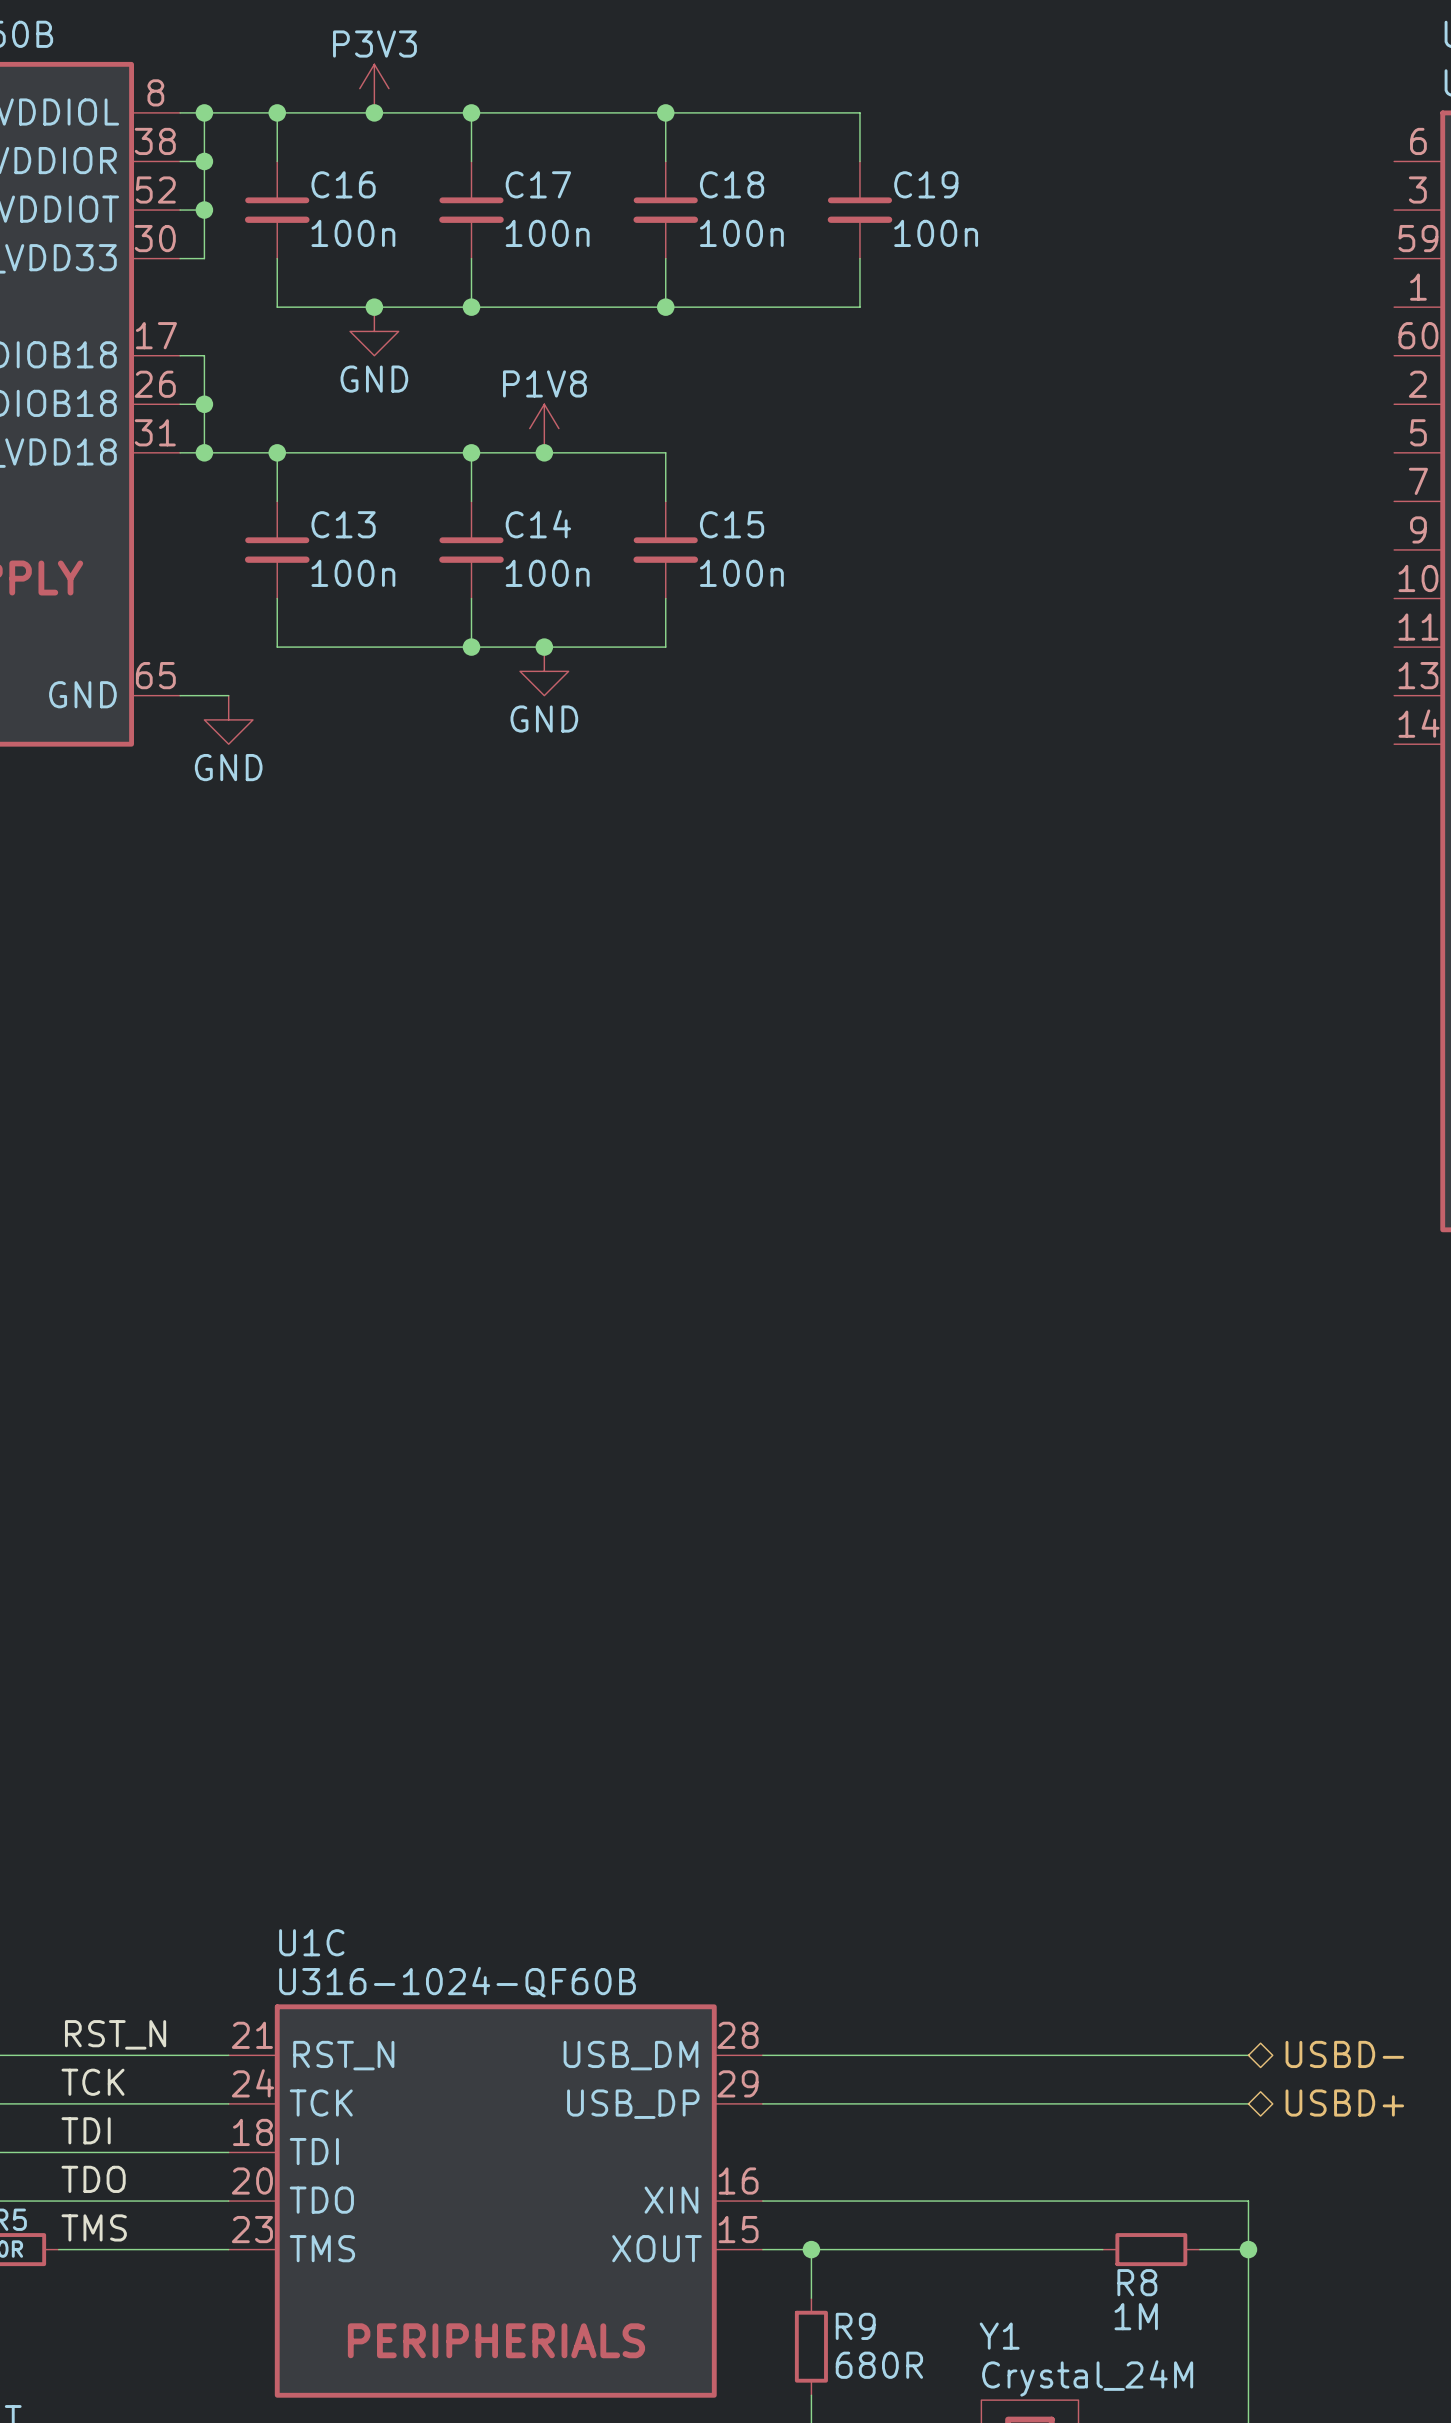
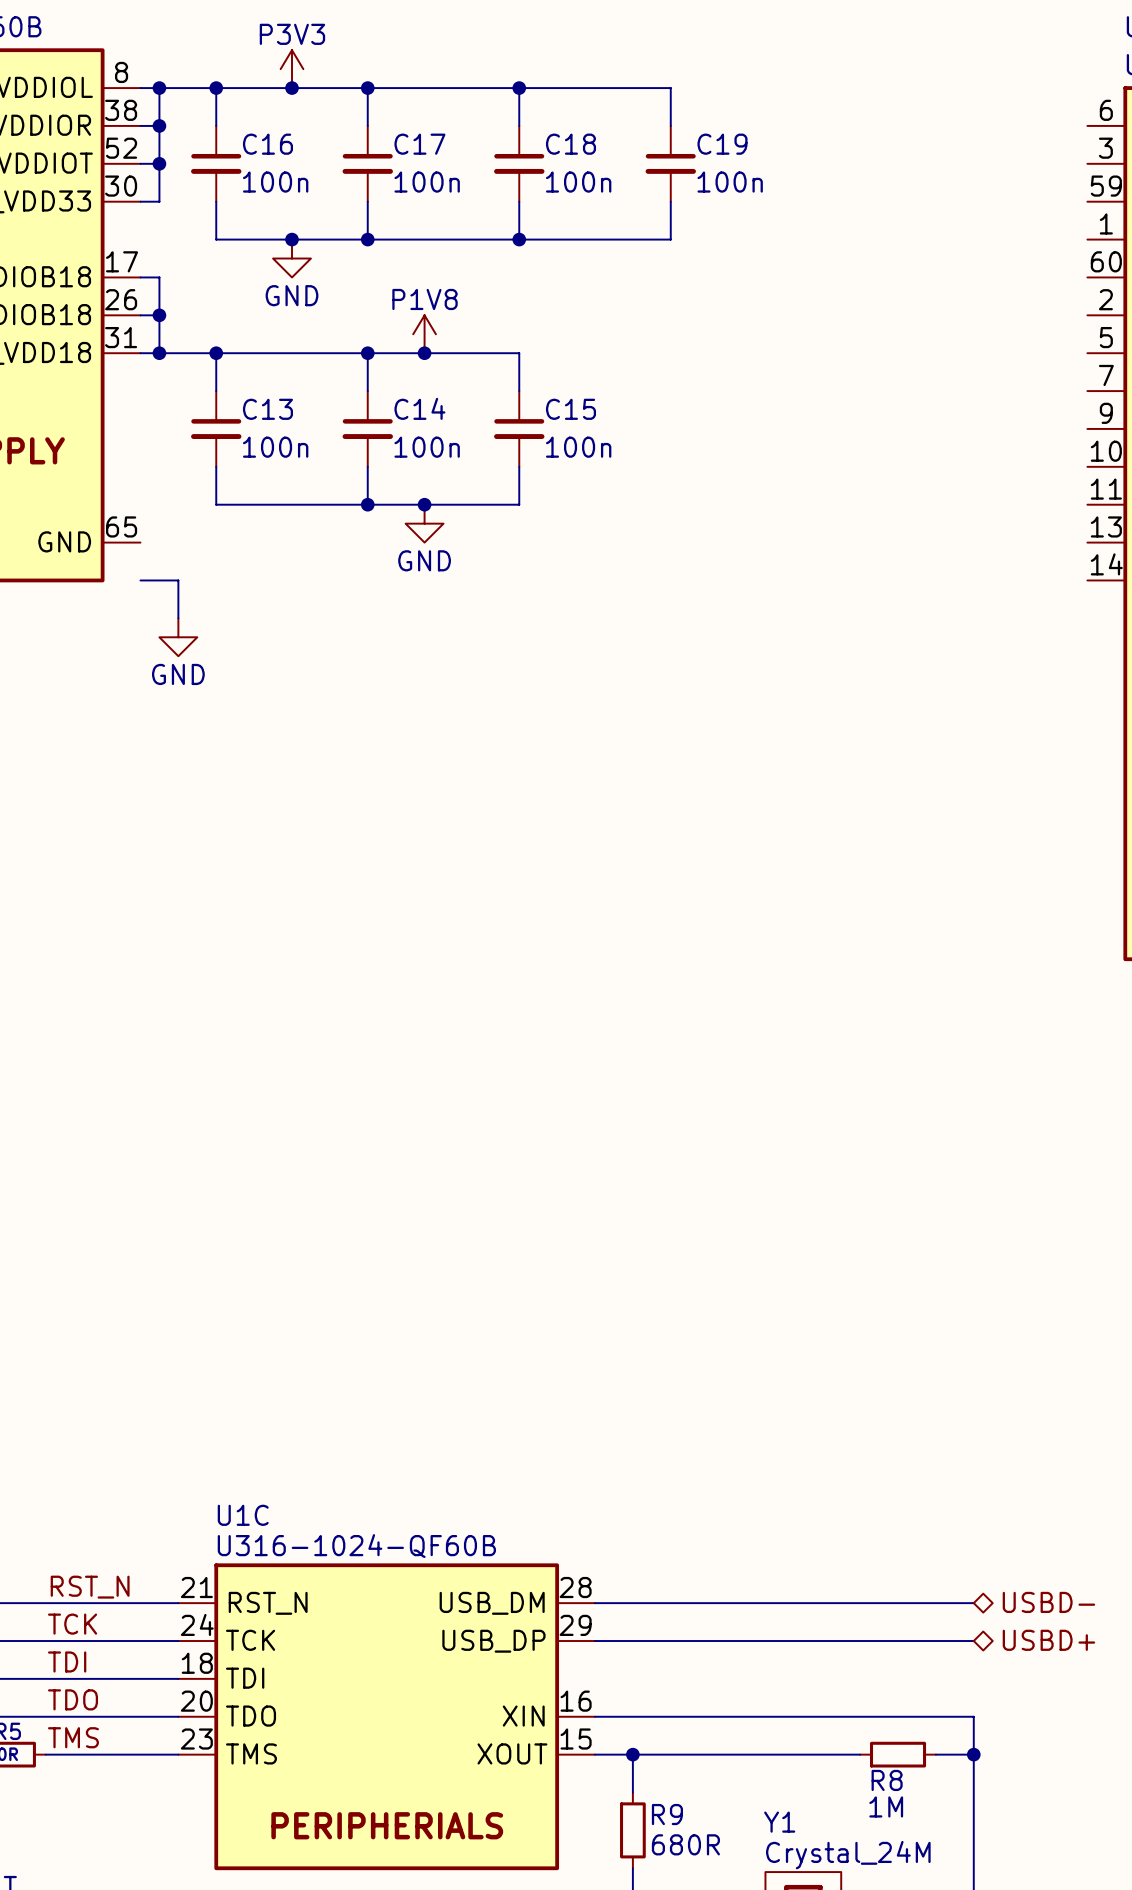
wire: (180, 695) (228, 695) -> none
power symbol position: GND (228, 719) -> GND (178, 637)
wire: none -> (140, 580) (178, 580) (178, 618)

